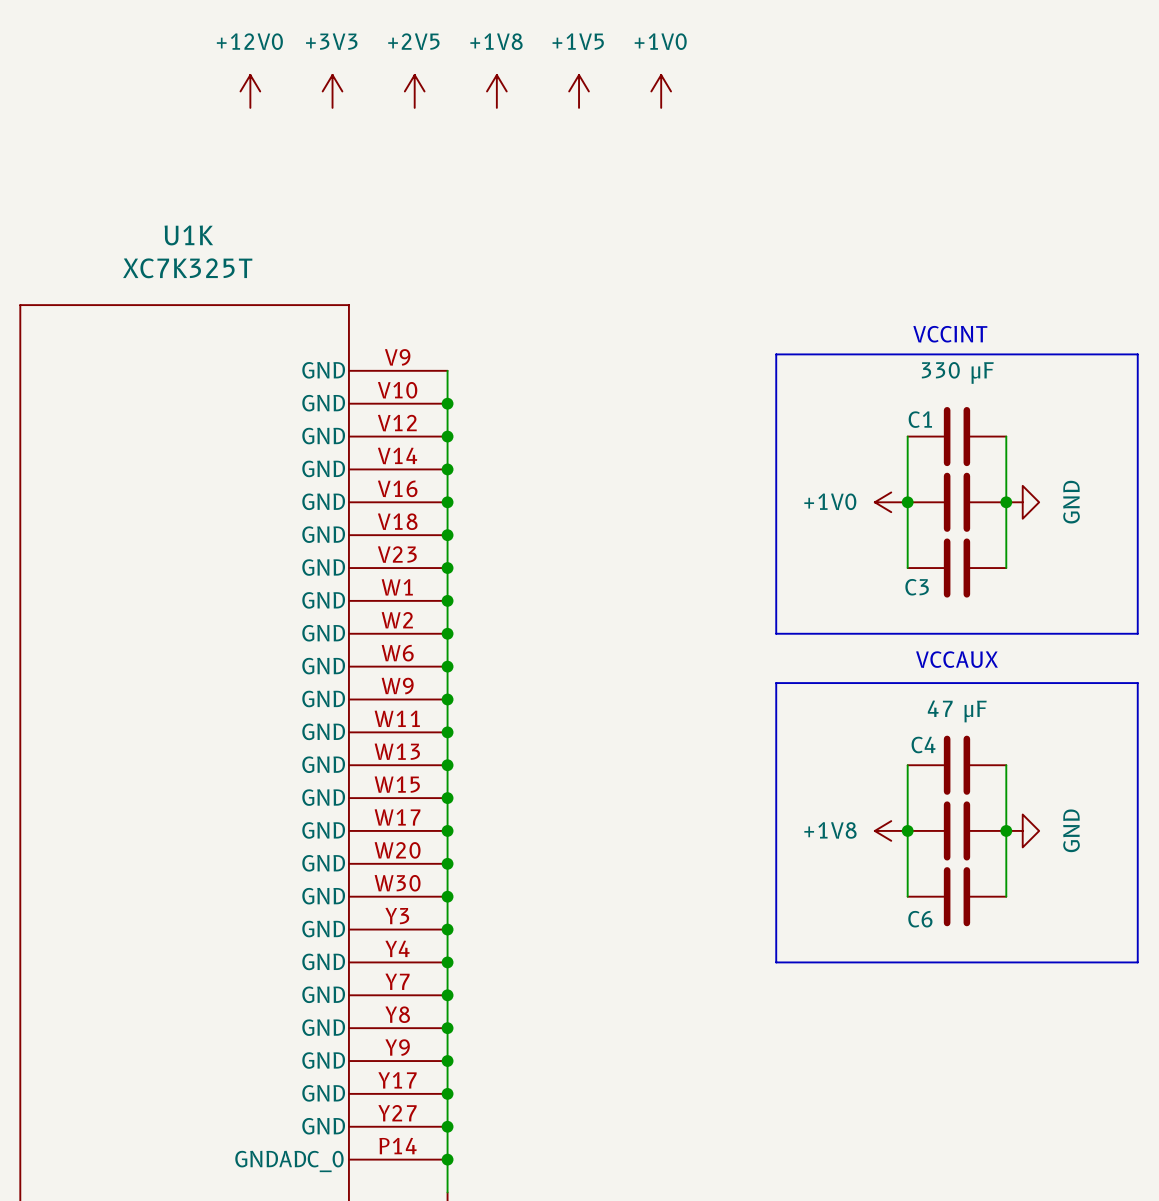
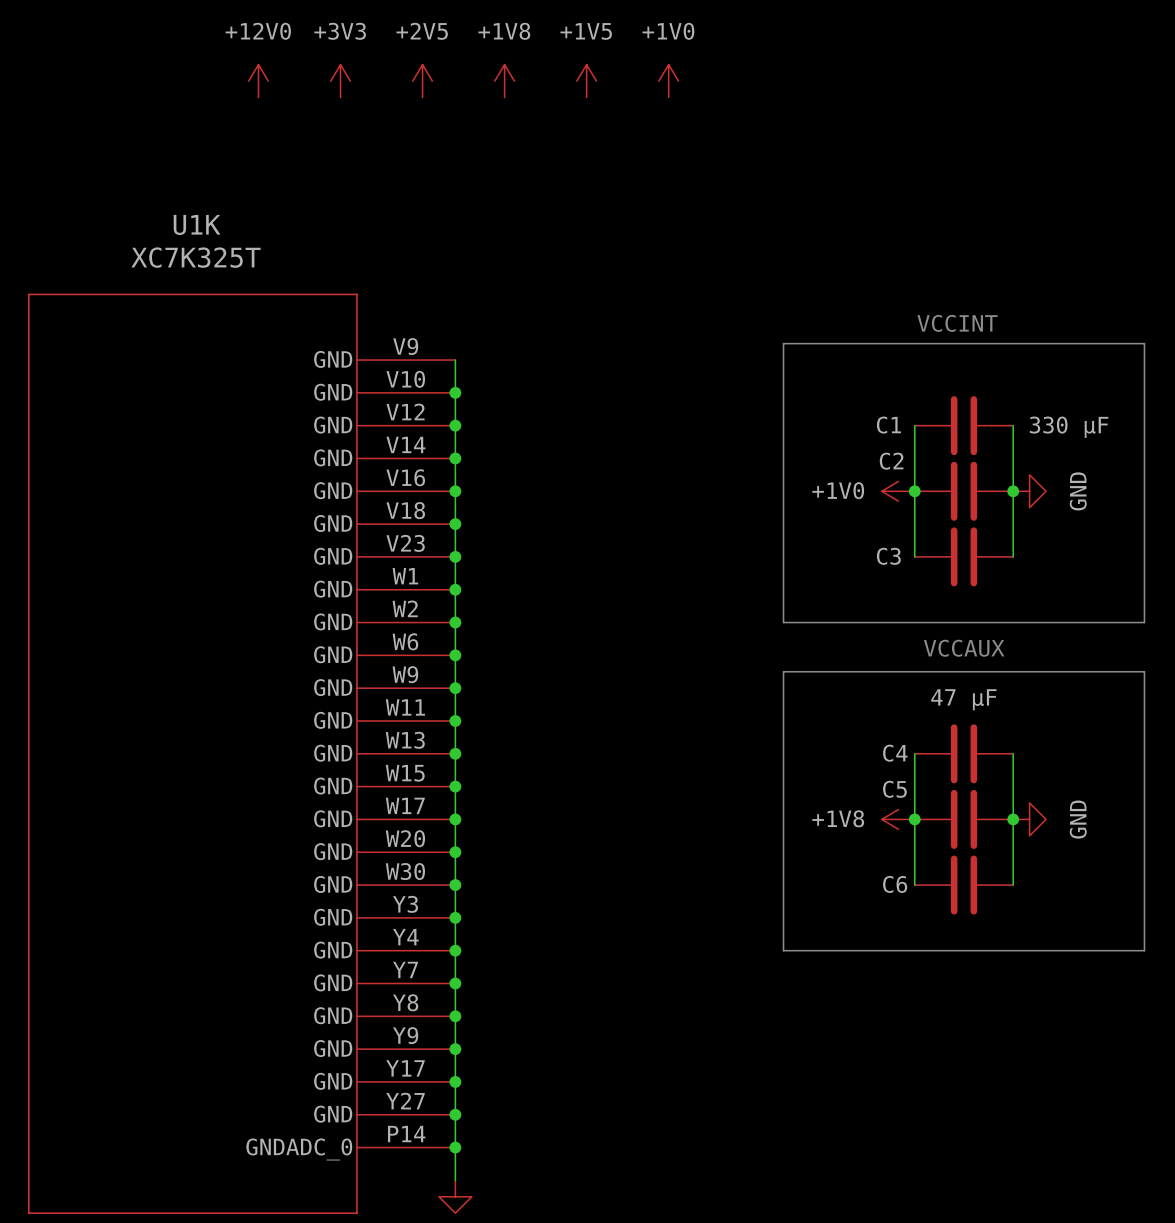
C1 value position: 330 μF (957, 372) -> 330 μF (1069, 427)
C1 name position: C1 (920, 419) -> C1 (888, 425)
C2 name: none -> C2 (891, 461)
C3 name position: C3 (917, 587) -> C3 (888, 556)
C4 name position: C4 (923, 744) -> C4 (895, 753)
C5 name: none -> C5 (894, 789)
C6 name position: C6 (920, 919) -> C6 (895, 884)

